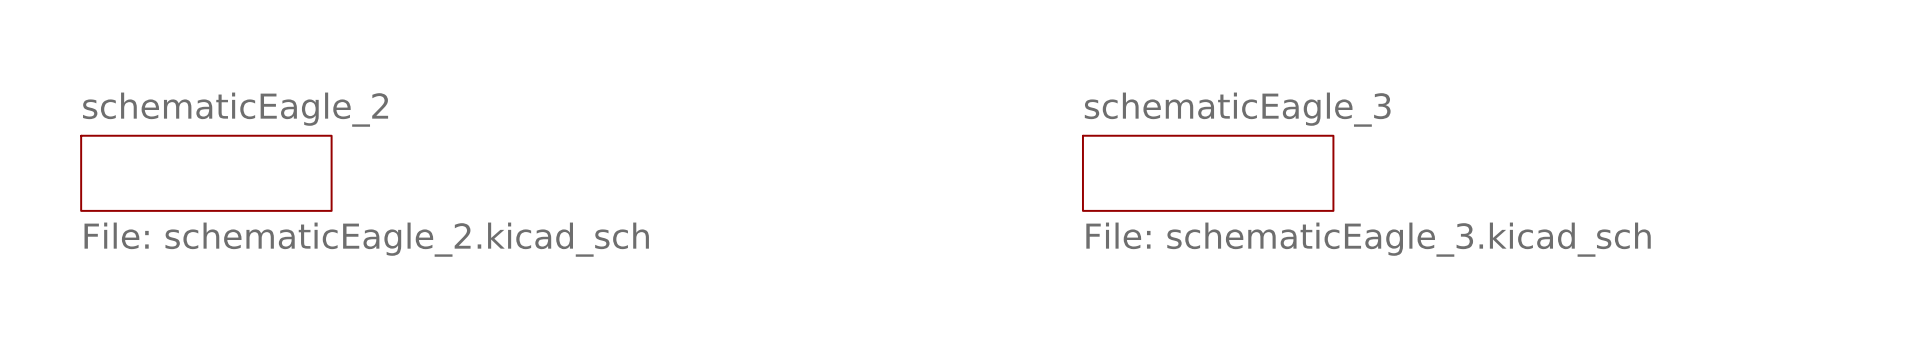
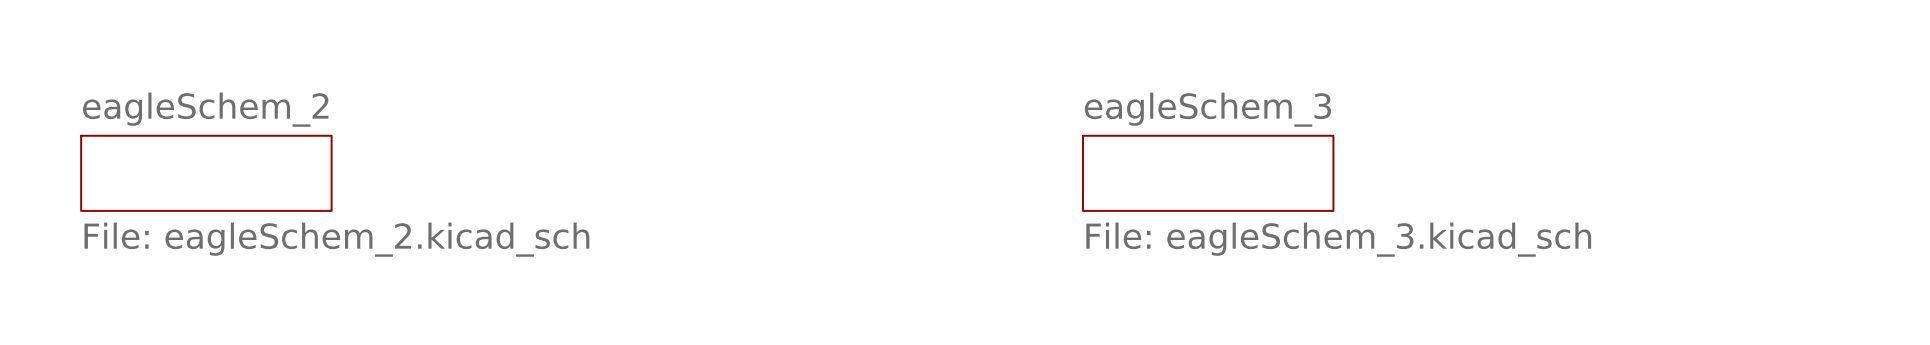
sheet schematicEagle_2 name: schematicEagle_2 (235, 109) -> eagleSchem_2 (205, 109)
sheet schematicEagle_3 name: schematicEagle_3 (1237, 109) -> eagleSchem_3 (1207, 109)
sheet schematicEagle_2 value: File: schematicEagle_2.kicad_sch (366, 239) -> File: eagleSchem_2.kicad_sch (336, 239)
sheet schematicEagle_3 value: File: schematicEagle_3.kicad_sch (1368, 239) -> File: eagleSchem_3.kicad_sch (1338, 239)

